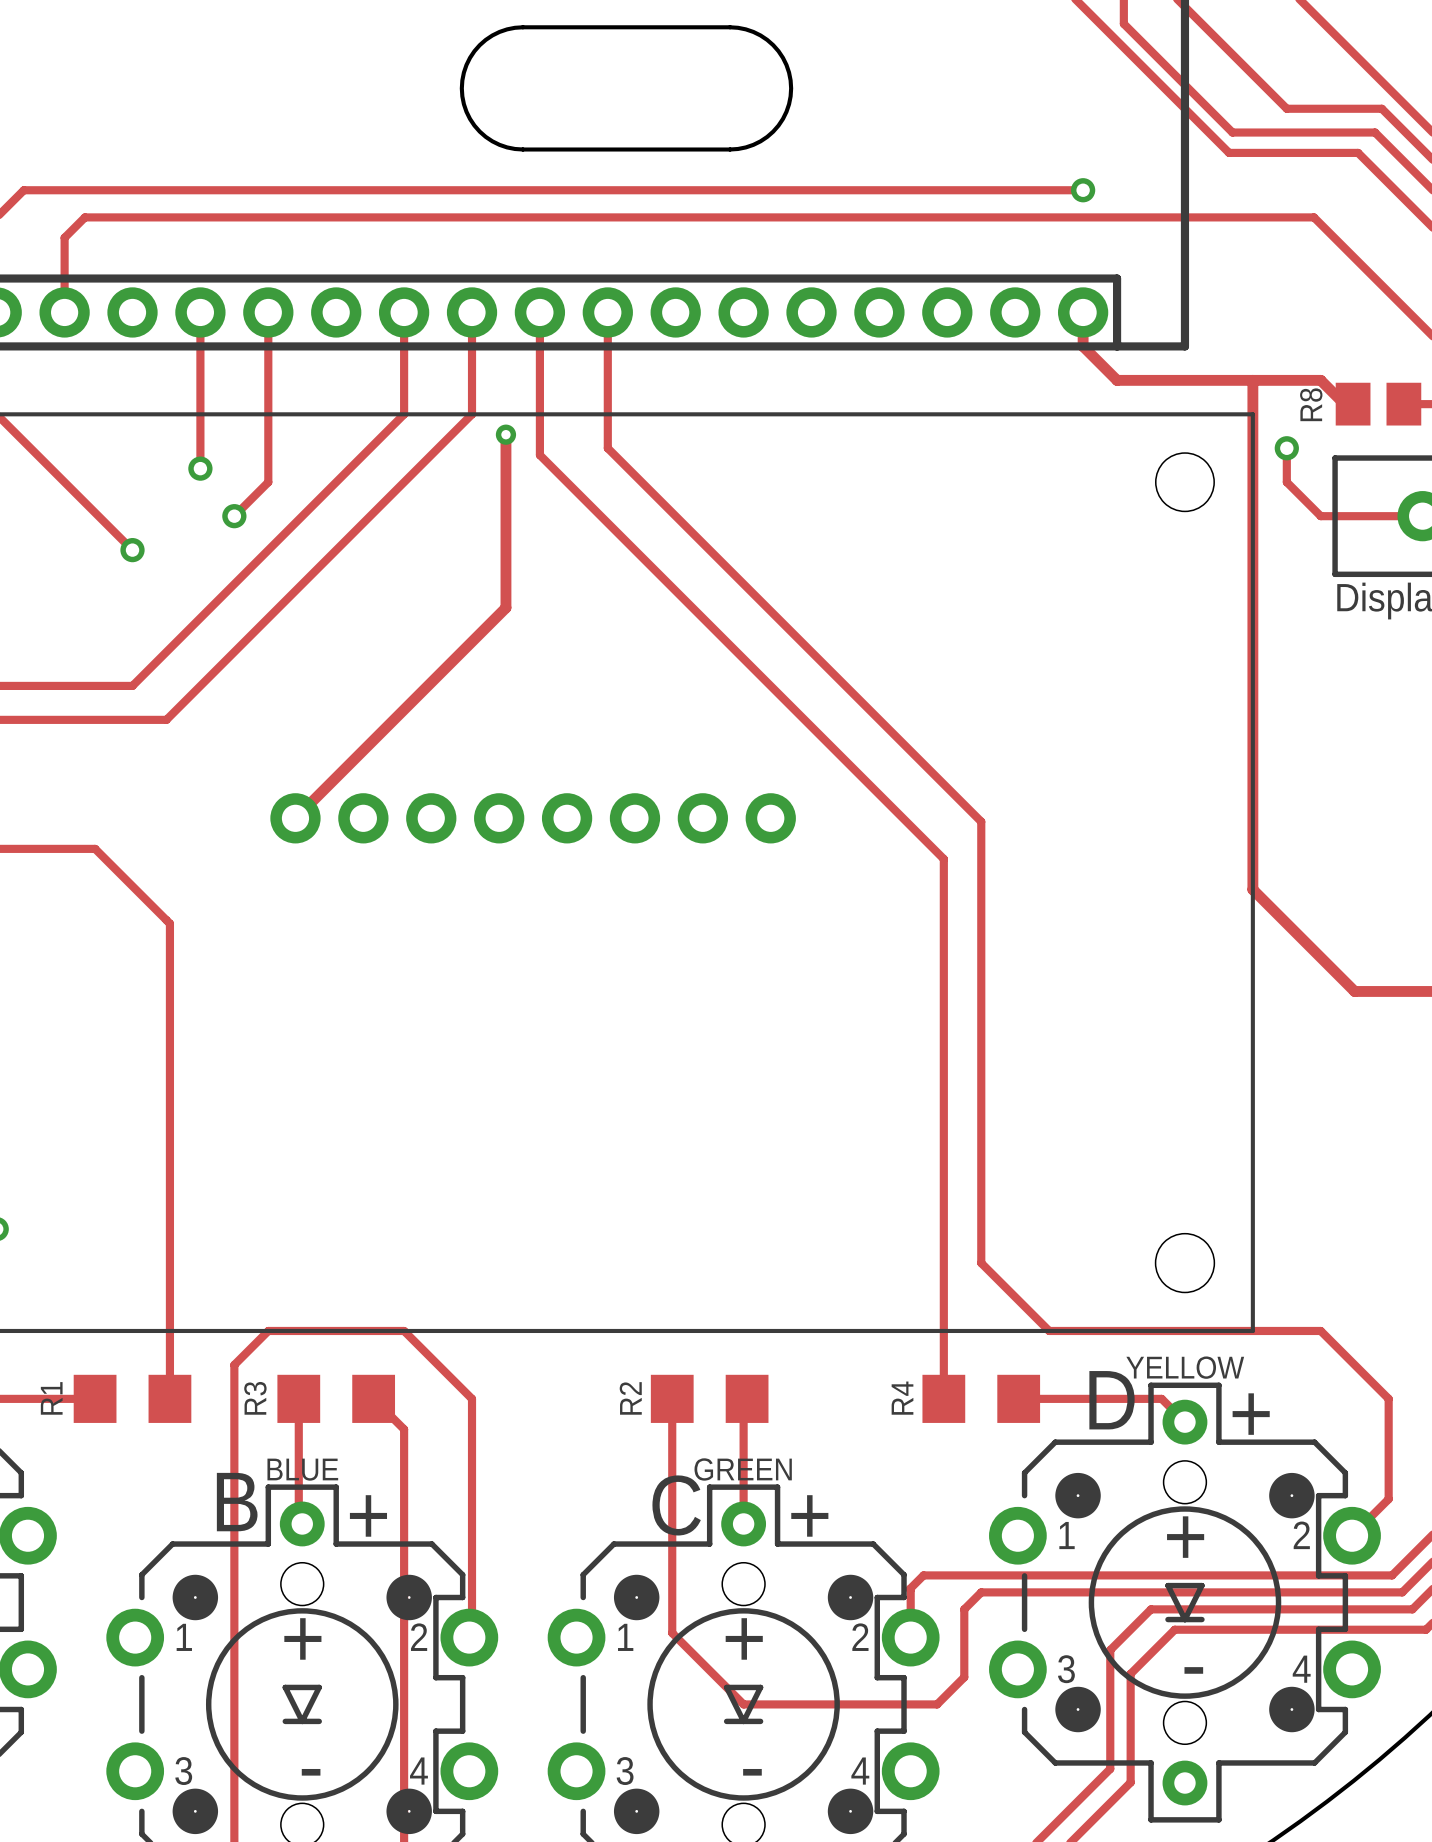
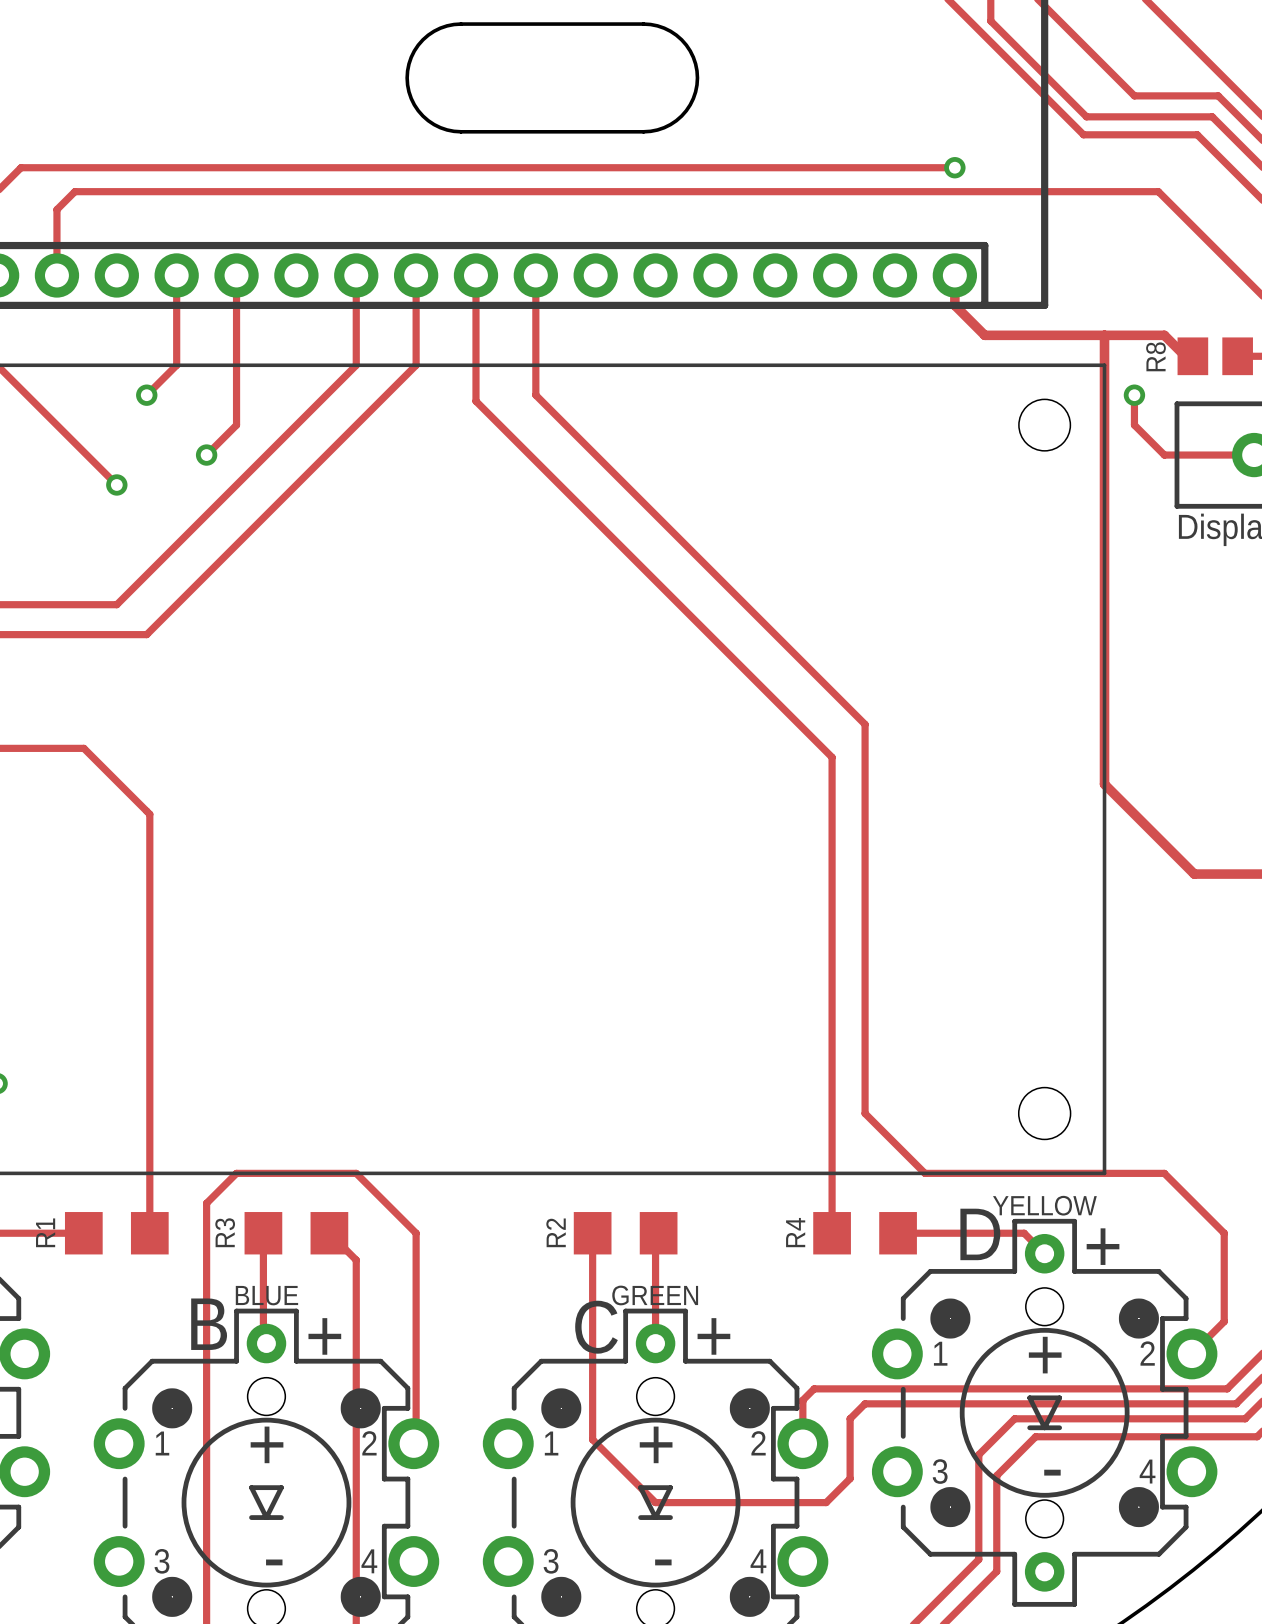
track: (200, 414) (200, 468) -> (176, 365) (146, 395)
track: (505, 434) (505, 607) (295, 818) -> none
via: (505, 434) -> none
via position: (200, 468) -> (146, 395)
part: (533, 818) -> none

